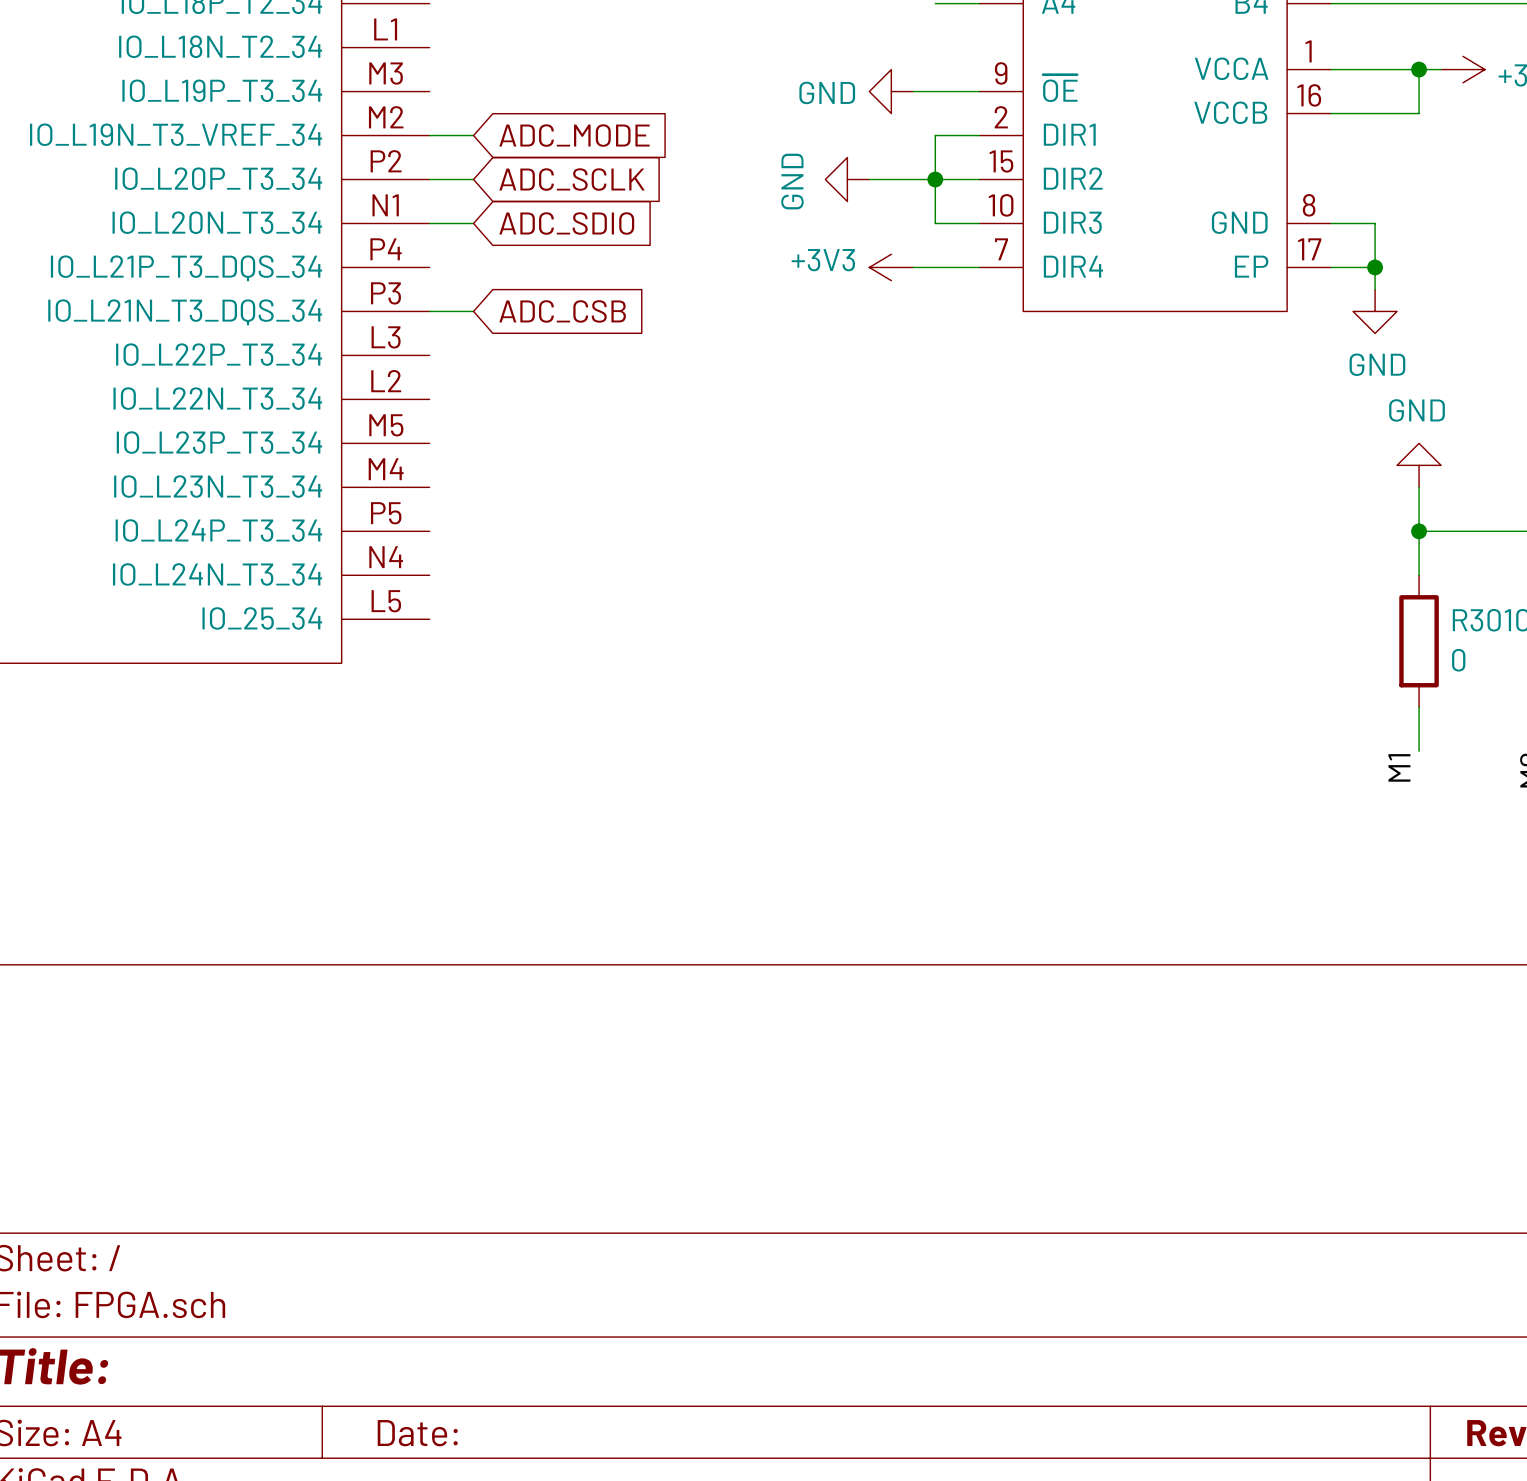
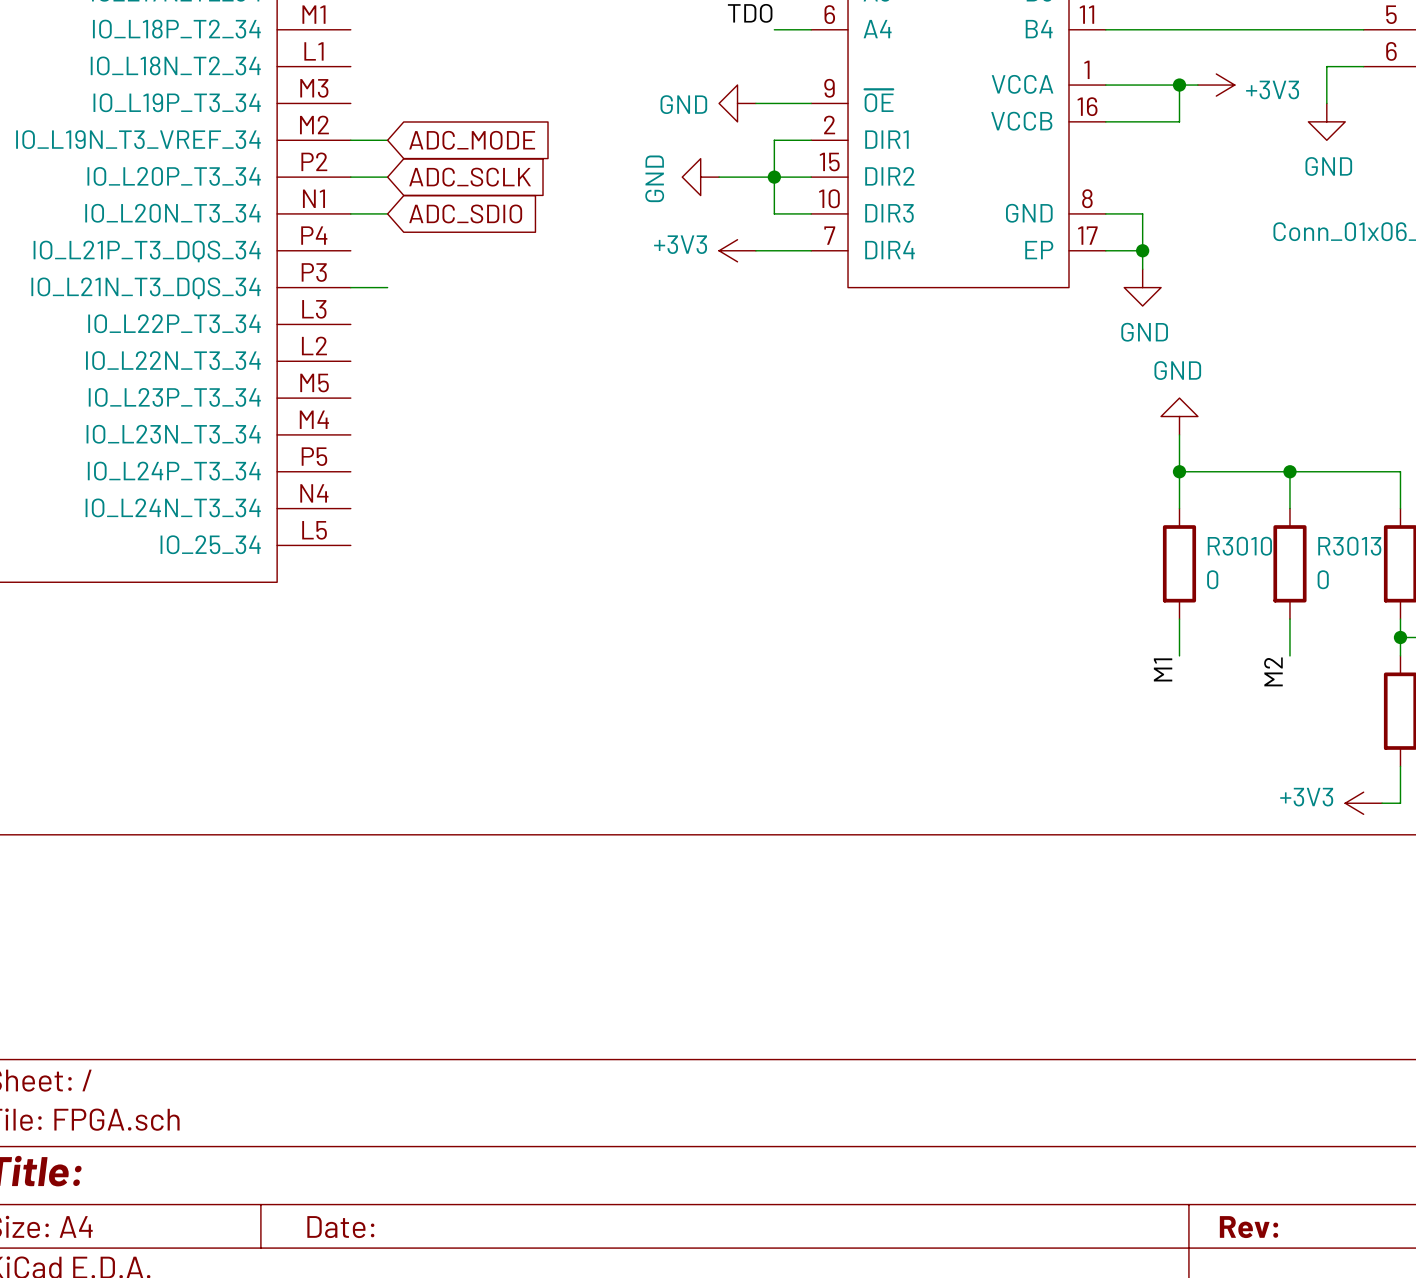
global label: ADC_CSB (562, 311) -> none

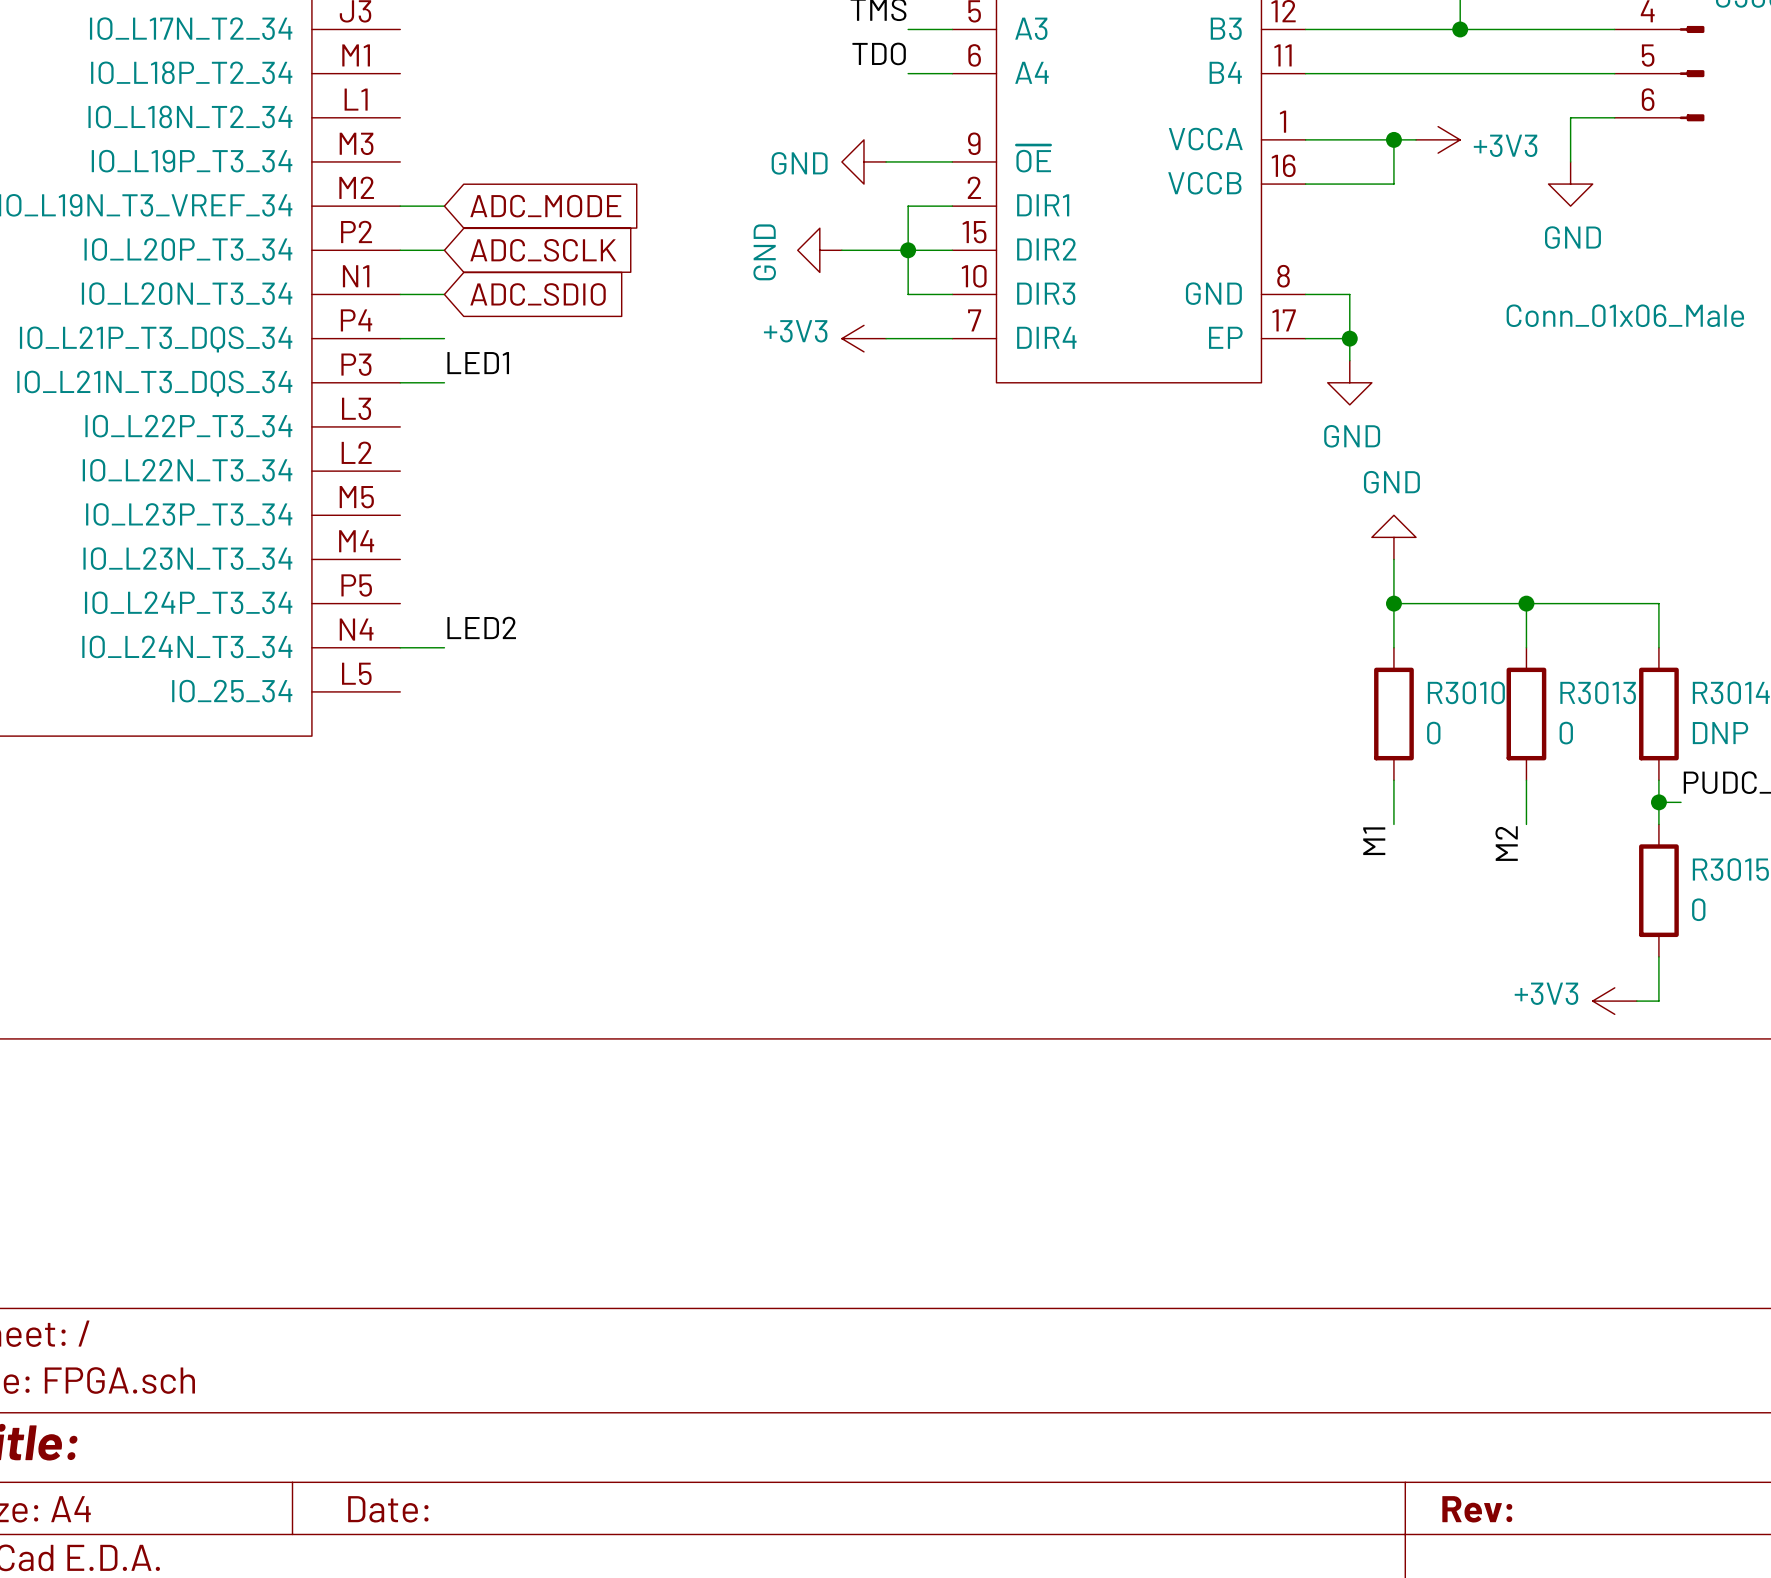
wire: none -> (400, 338) (444, 338)
label: none -> LED1 (478, 363)
label: none -> LED2 (481, 627)
wire: none -> (400, 647) (444, 647)

